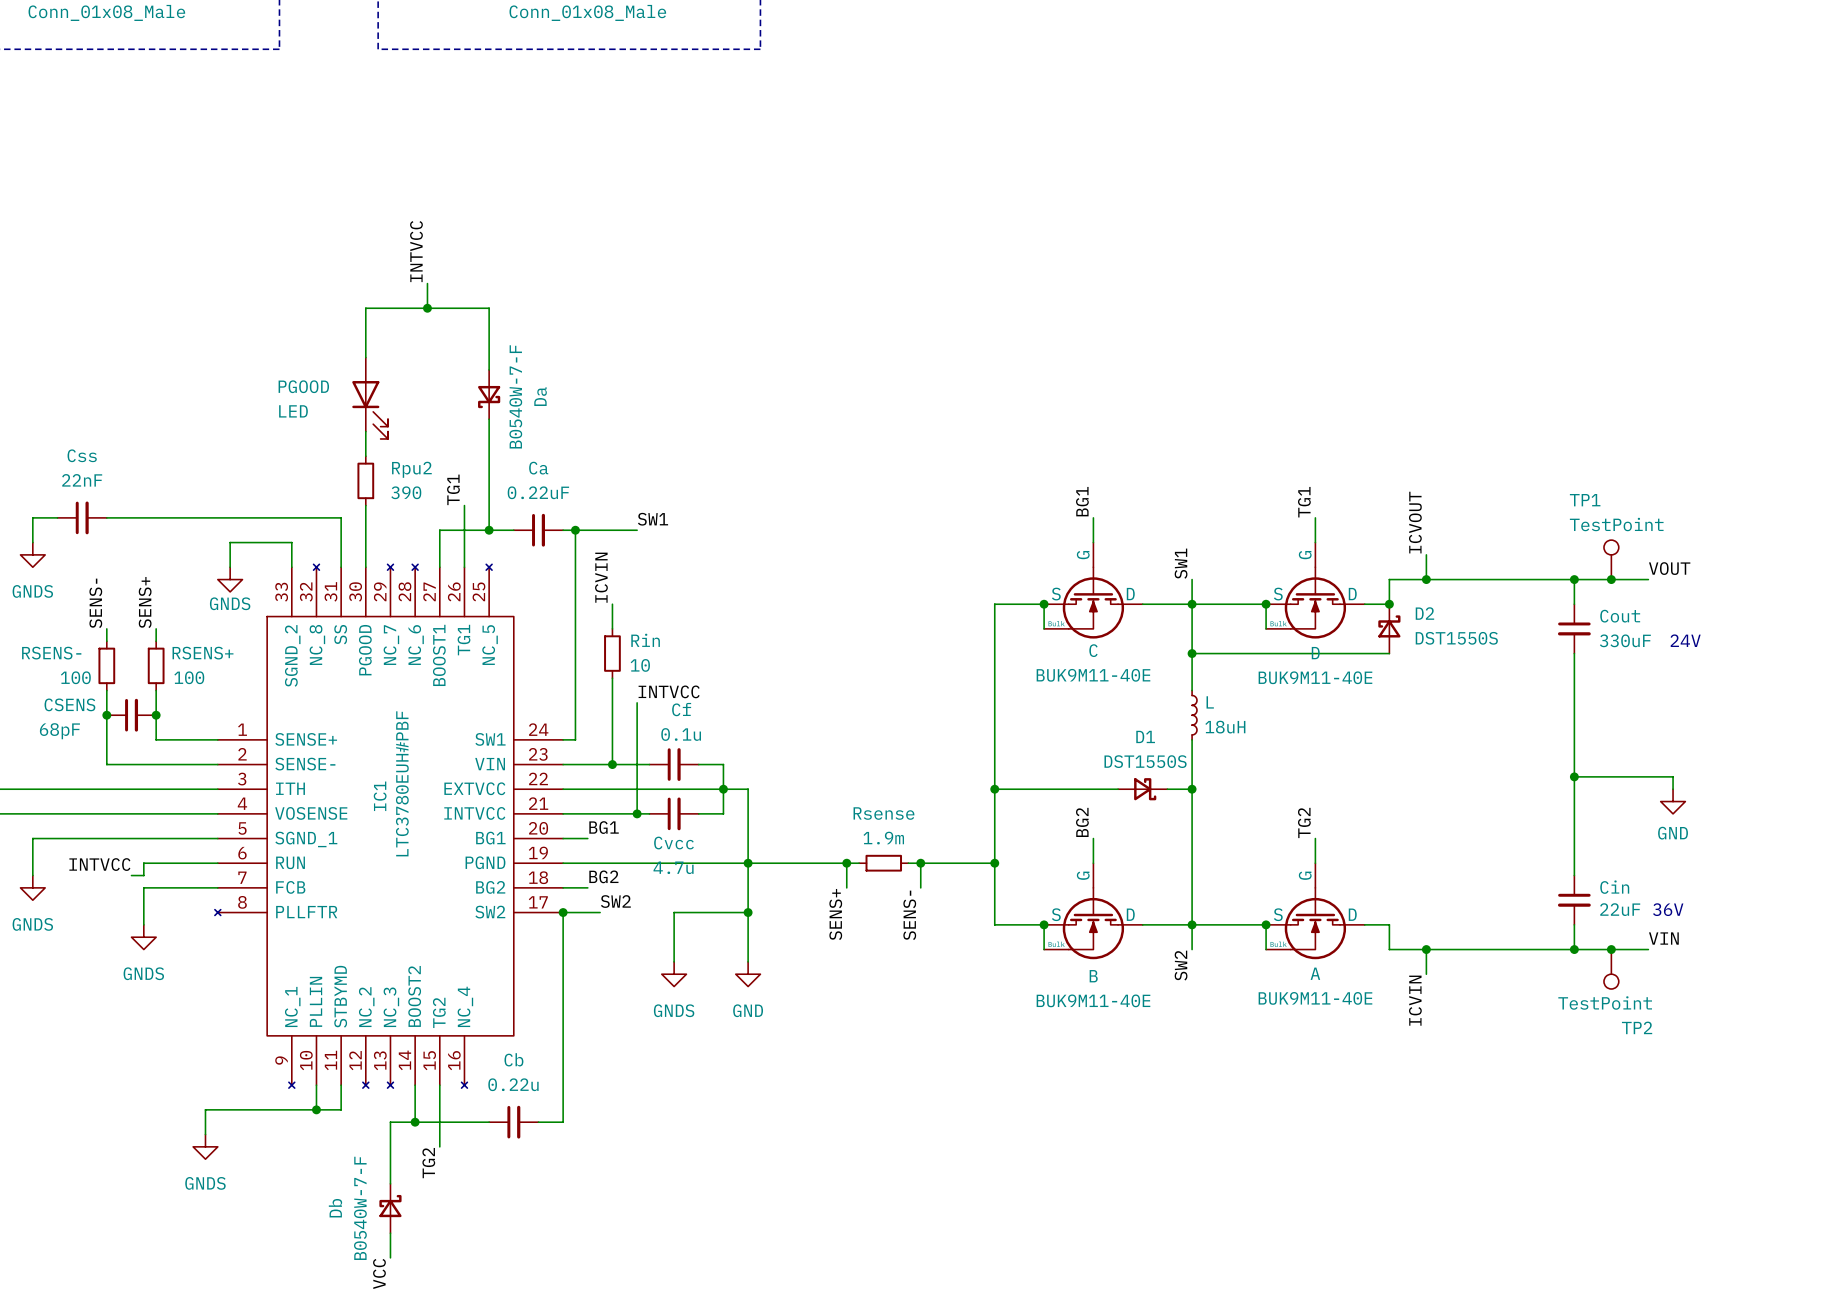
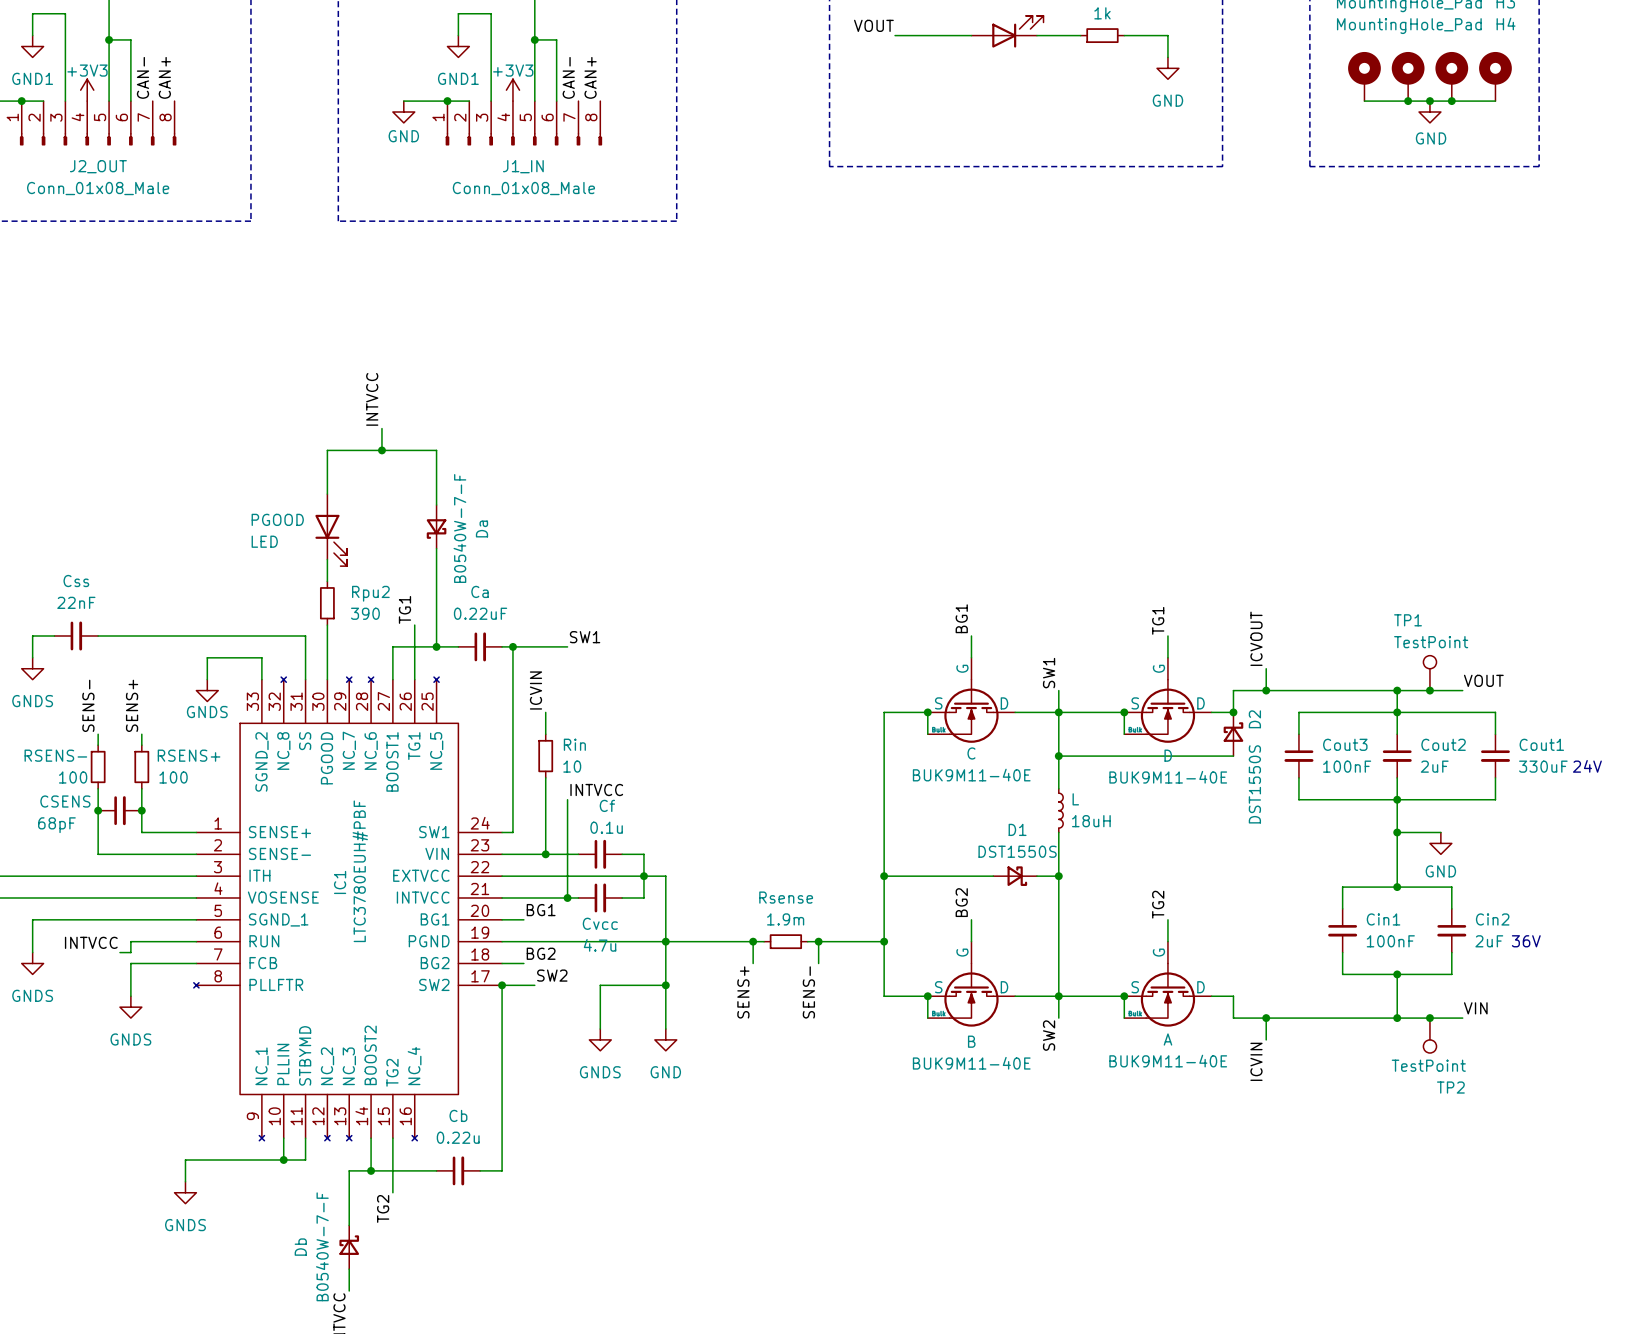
junction: none -> (1397, 712)
D2 name rotation: 0° (1424, 613) -> 90° counterclockwise (1254, 719)
wire: none -> (1298, 734) (1298, 712) (1495, 712) (1495, 734)
Cout: 330uF (1574, 628) -> none
D2 value rotation: 0° (1456, 638) -> 90° counterclockwise (1254, 784)
text position: 24V (1685, 640) -> 24V (1587, 766)
Cout3: none -> 100nF (1298, 756)
Cout2: none -> 2uF (1397, 756)
Cout1: none -> 330uF (1495, 756)
wire: none -> (1298, 777) (1298, 799) (1495, 799) (1495, 777)
junction: none -> (1397, 799)
wire: none -> (1397, 832) (1440, 832)
junction: none -> (1397, 832)
wire: (1574, 776) (1673, 776) (1673, 789) -> none
junction: (1574, 776) -> none
wire: (1574, 801) (1574, 875) -> none
junction: none -> (1397, 887)
power symbol position: GND (1673, 801) -> GND (1440, 843)
wire: none -> (1342, 908) (1342, 887) (1451, 887) (1451, 908)
Cin1: none -> 100nF (1342, 930)
Cin2: none -> 2uF (1451, 930)
wire: none -> (1342, 952) (1342, 974) (1451, 974) (1451, 952)
junction: none -> (1397, 974)
Cin: 22uF (1574, 900) -> none
text position: 36V (1668, 909) -> 36V (1526, 941)

